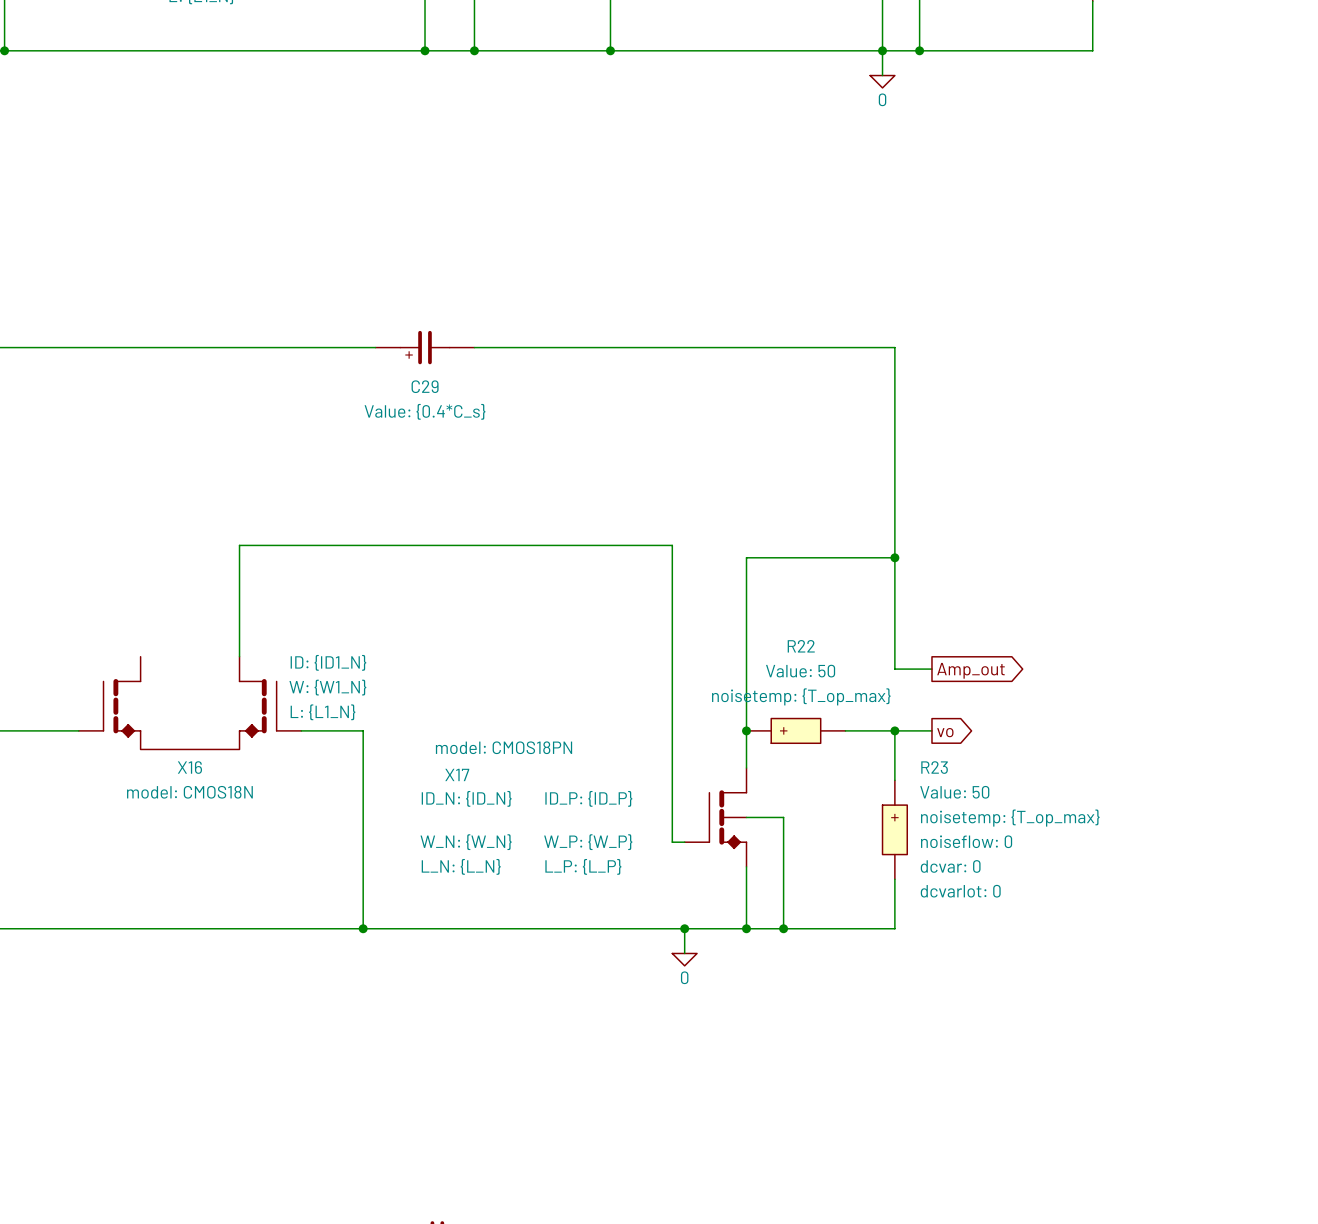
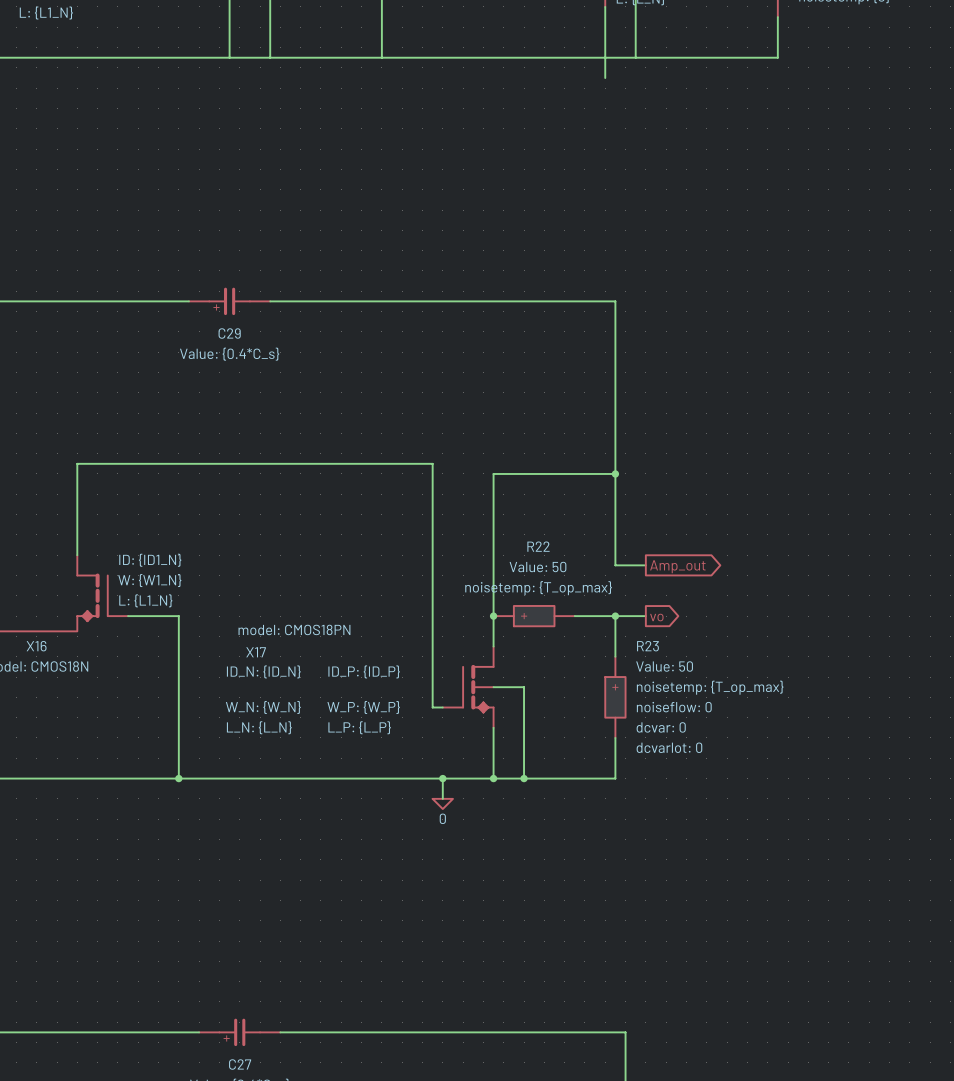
junction: (425, 50) -> none
junction: (474, 50) -> none
junction: (610, 50) -> none
junction: (882, 50) -> none
junction: (919, 50) -> none
power symbol: 0 (882, 81) -> none

